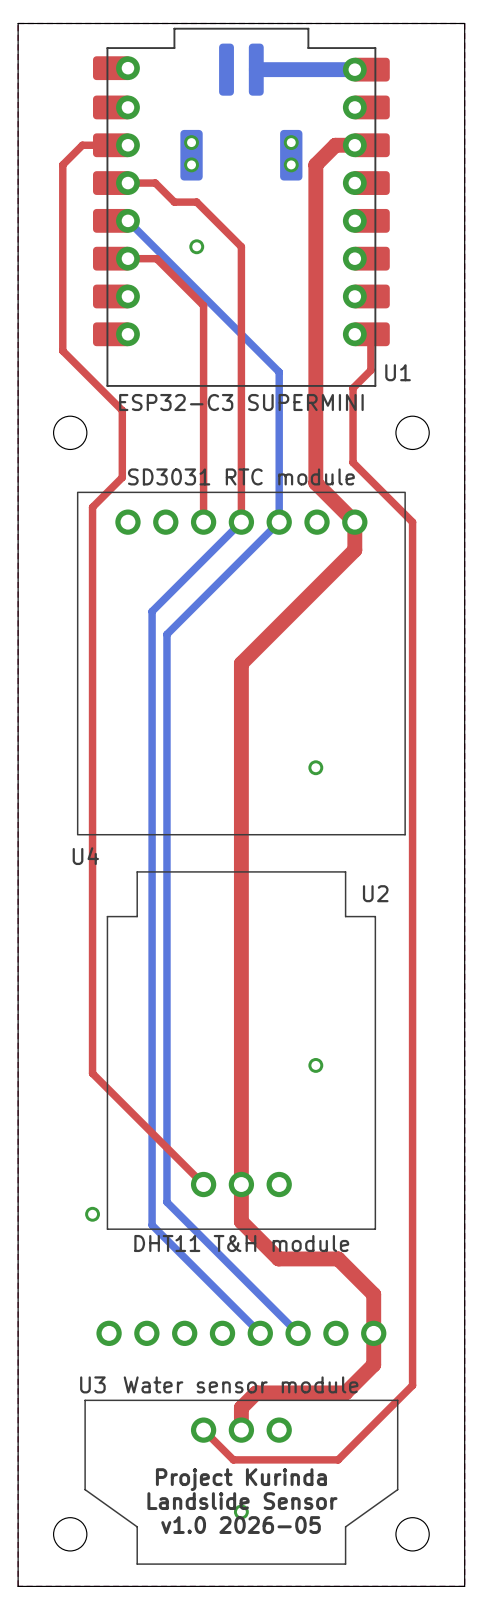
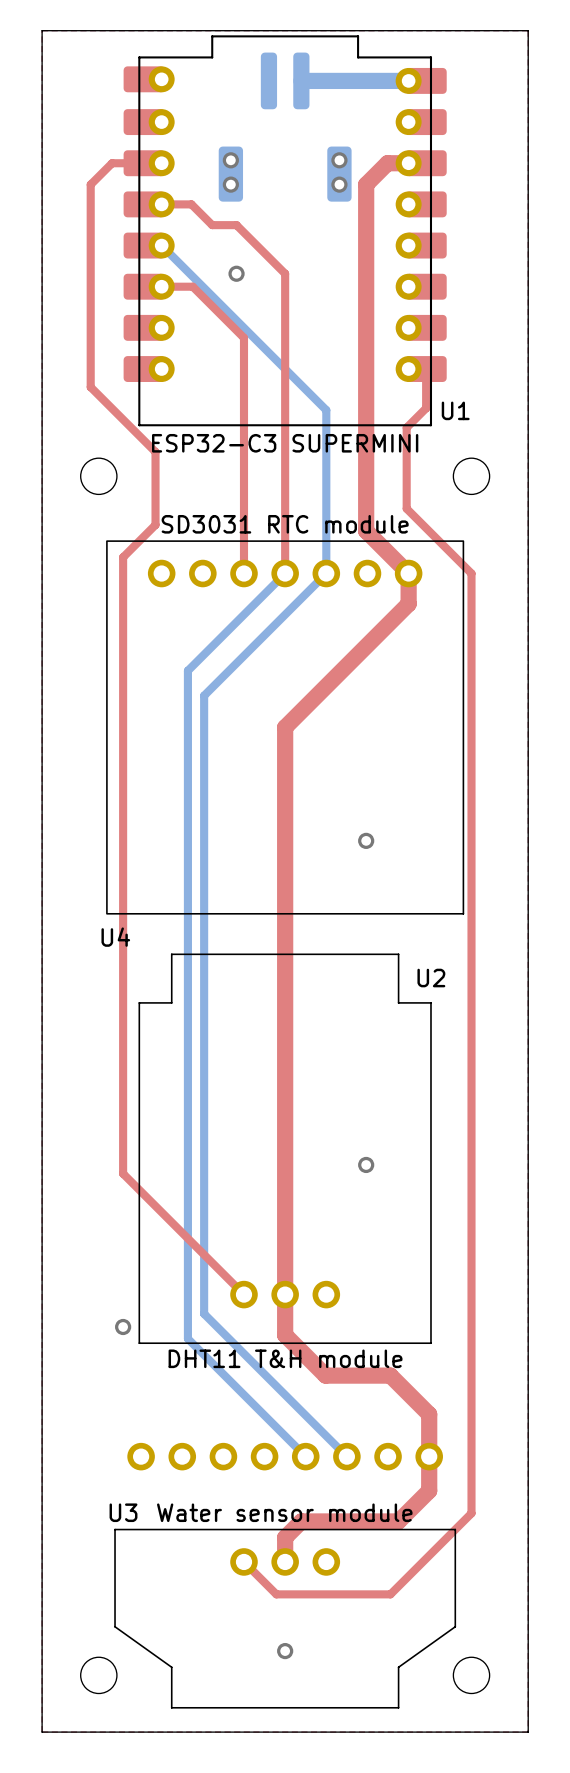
text: Project Kurinda (241, 1479) -> none
text: Landslide Sensor (242, 1501) -> none
text: v1.0 2026-05 (241, 1525) -> none

